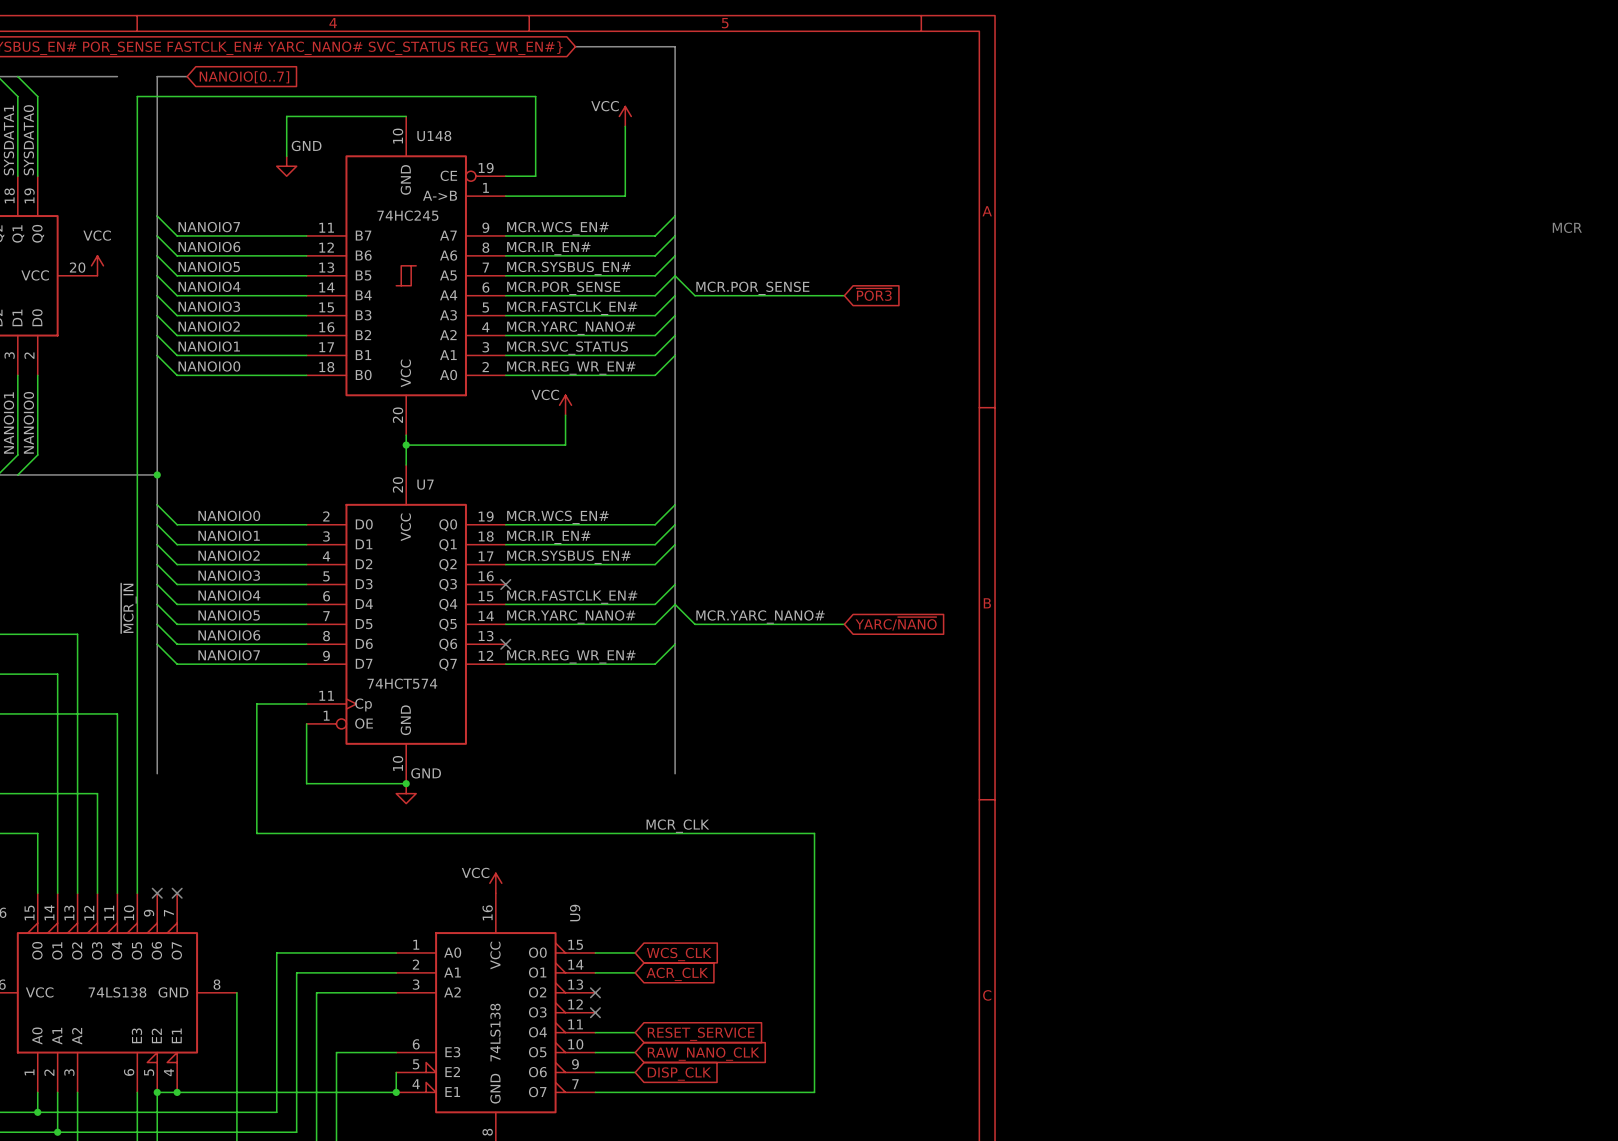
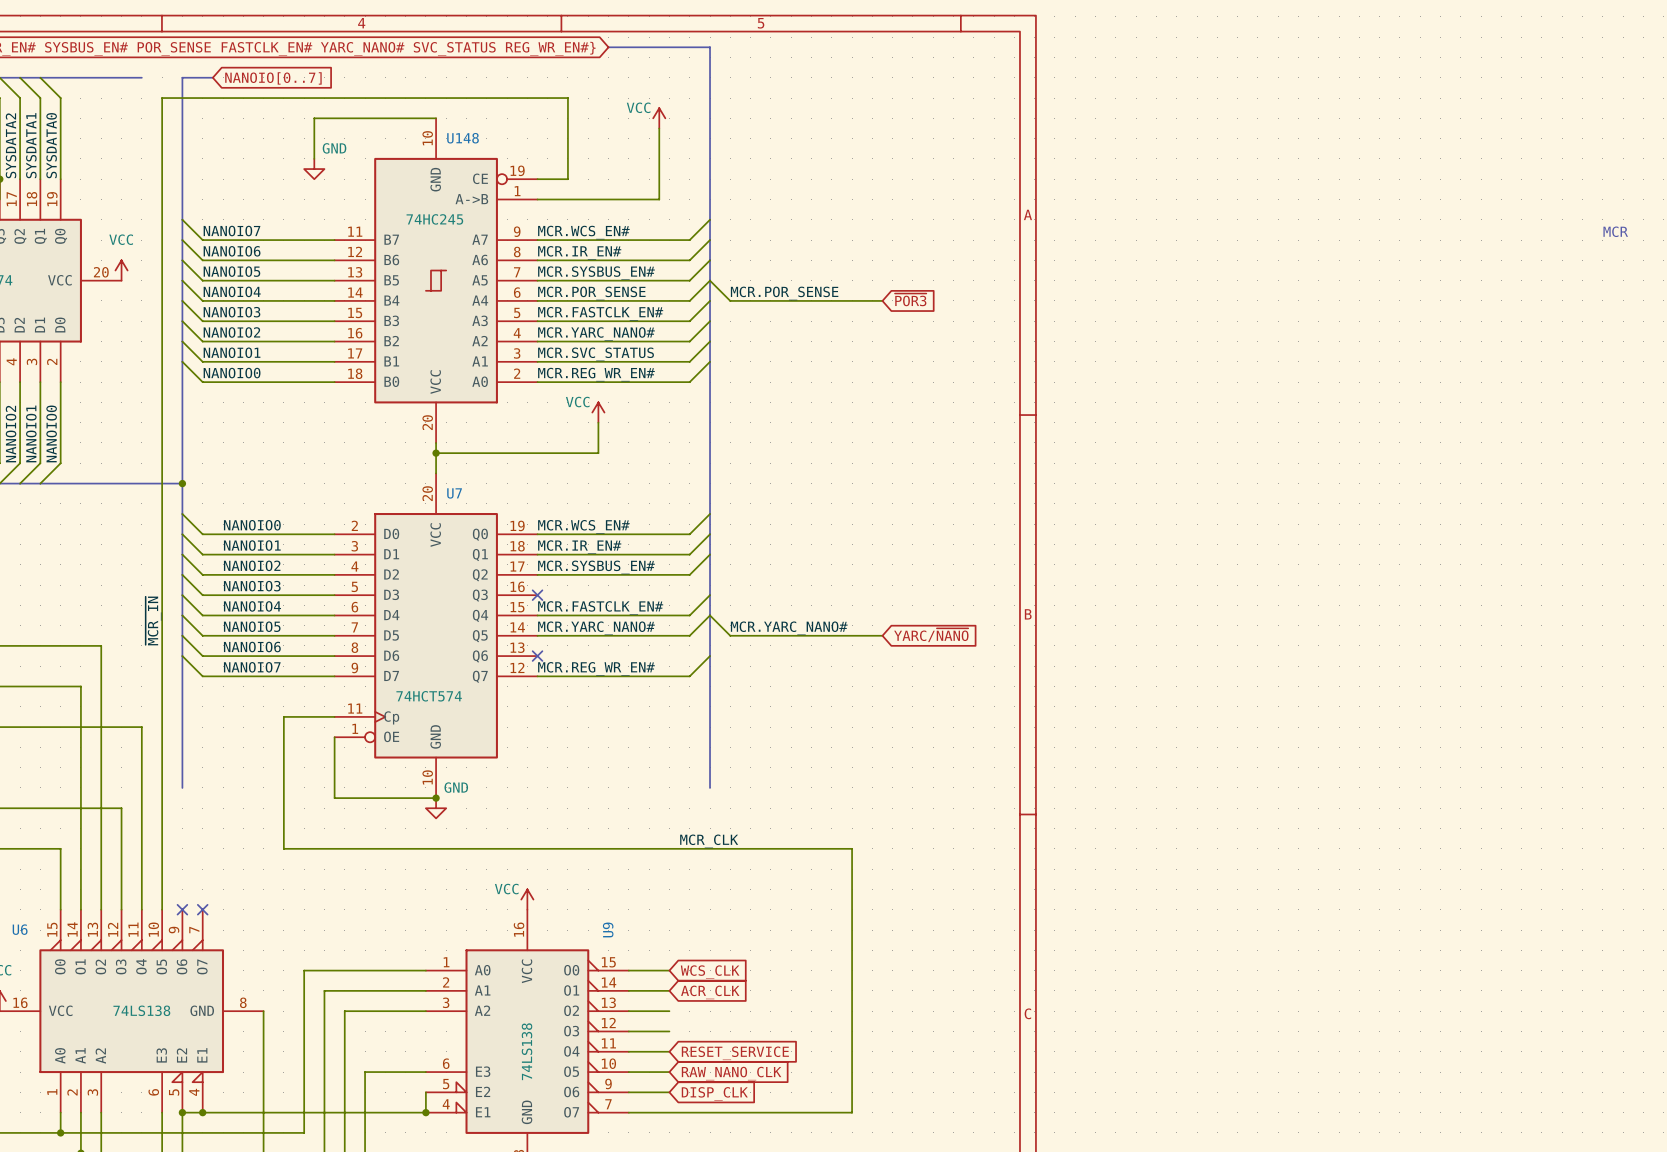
wire: none -> (628, 1011) (669, 1011)
no-connect mark: (595, 992) -> none
wire: none -> (628, 1031) (669, 1031)
no-connect mark: (595, 1012) -> none

